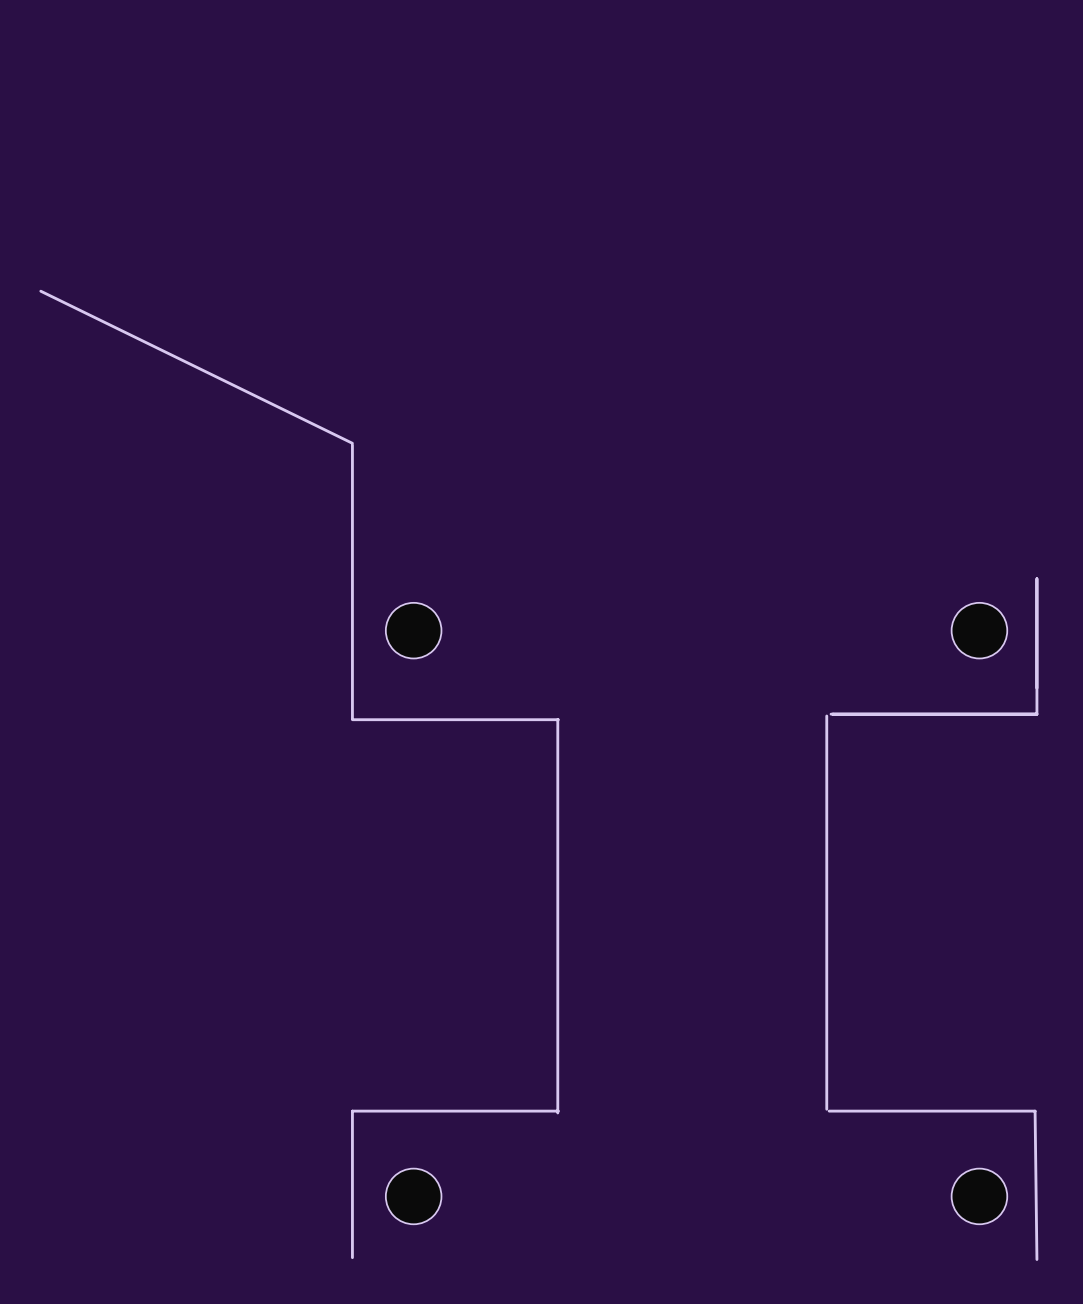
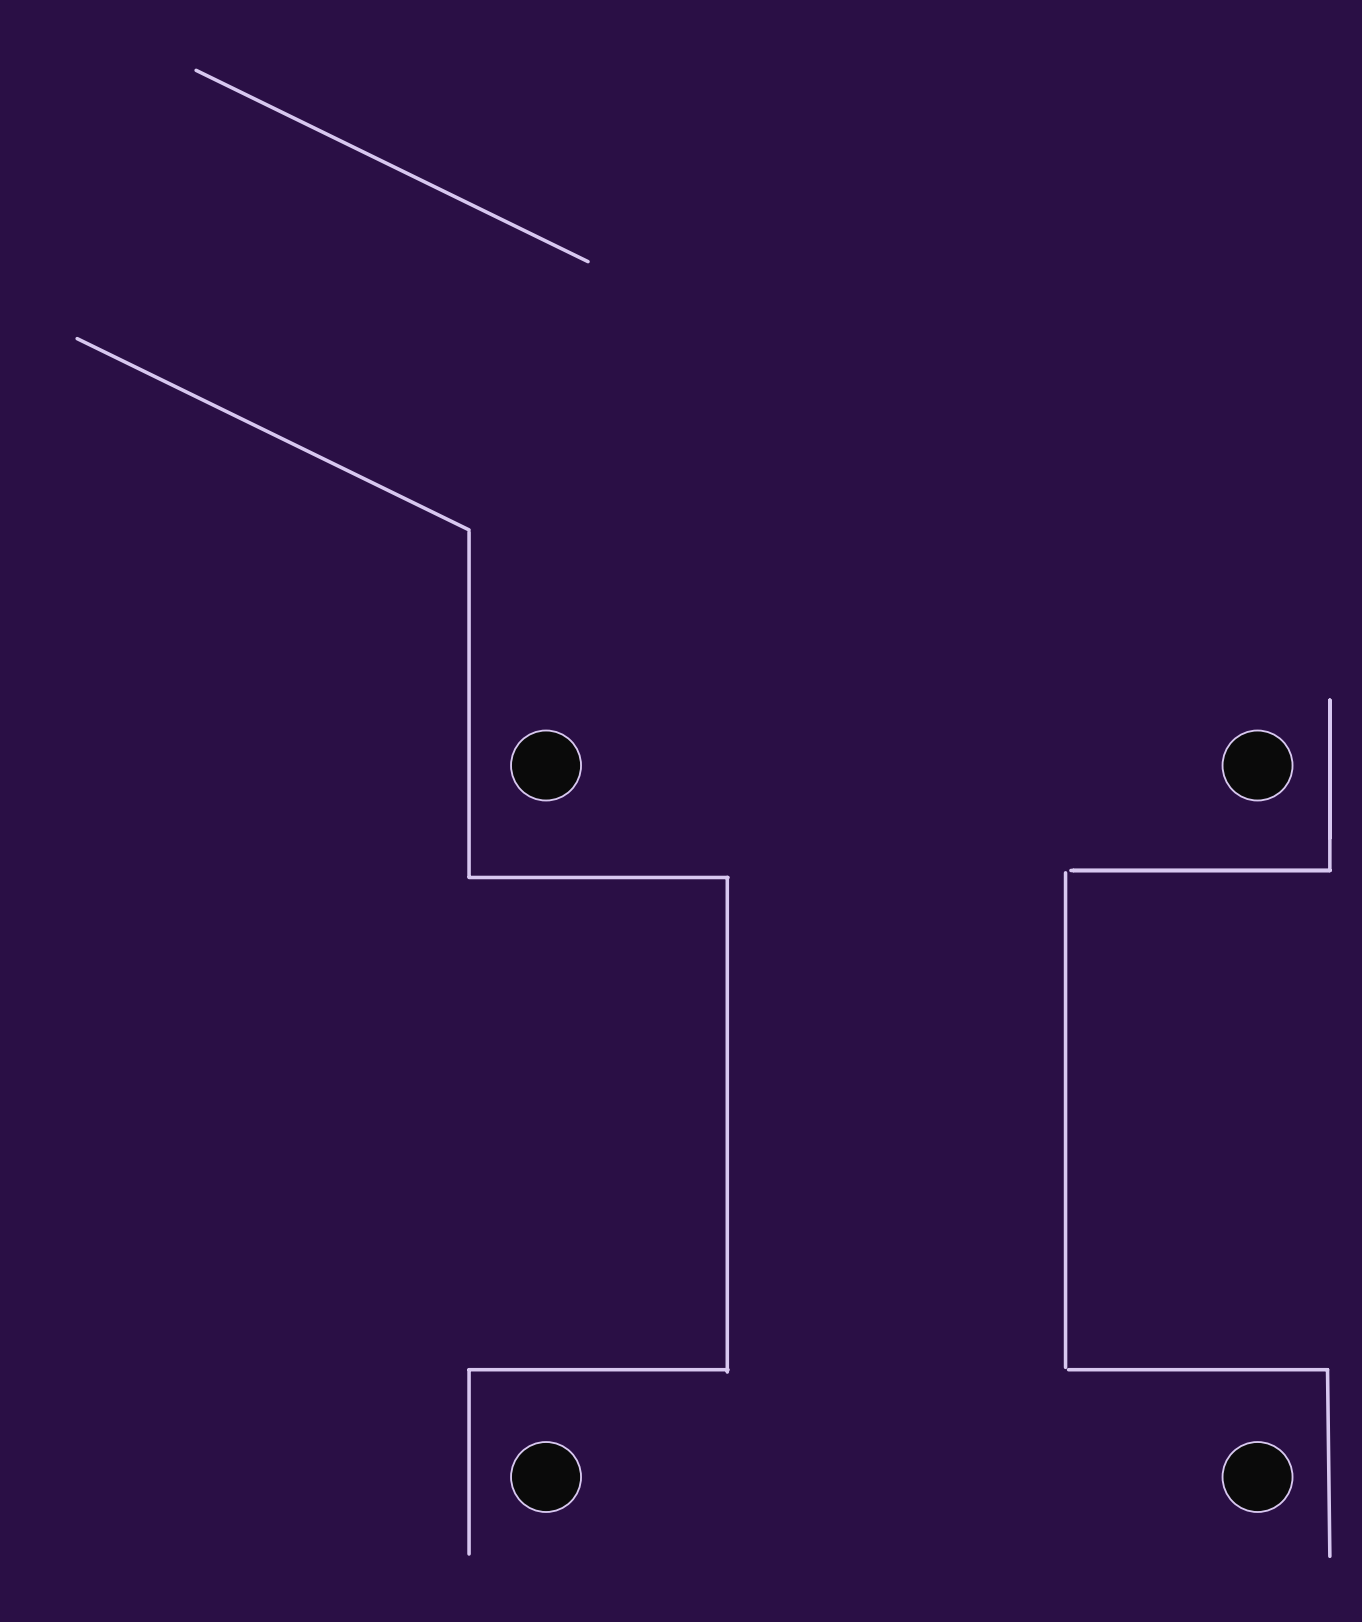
board edge: none -> (196, 70) (588, 261)

